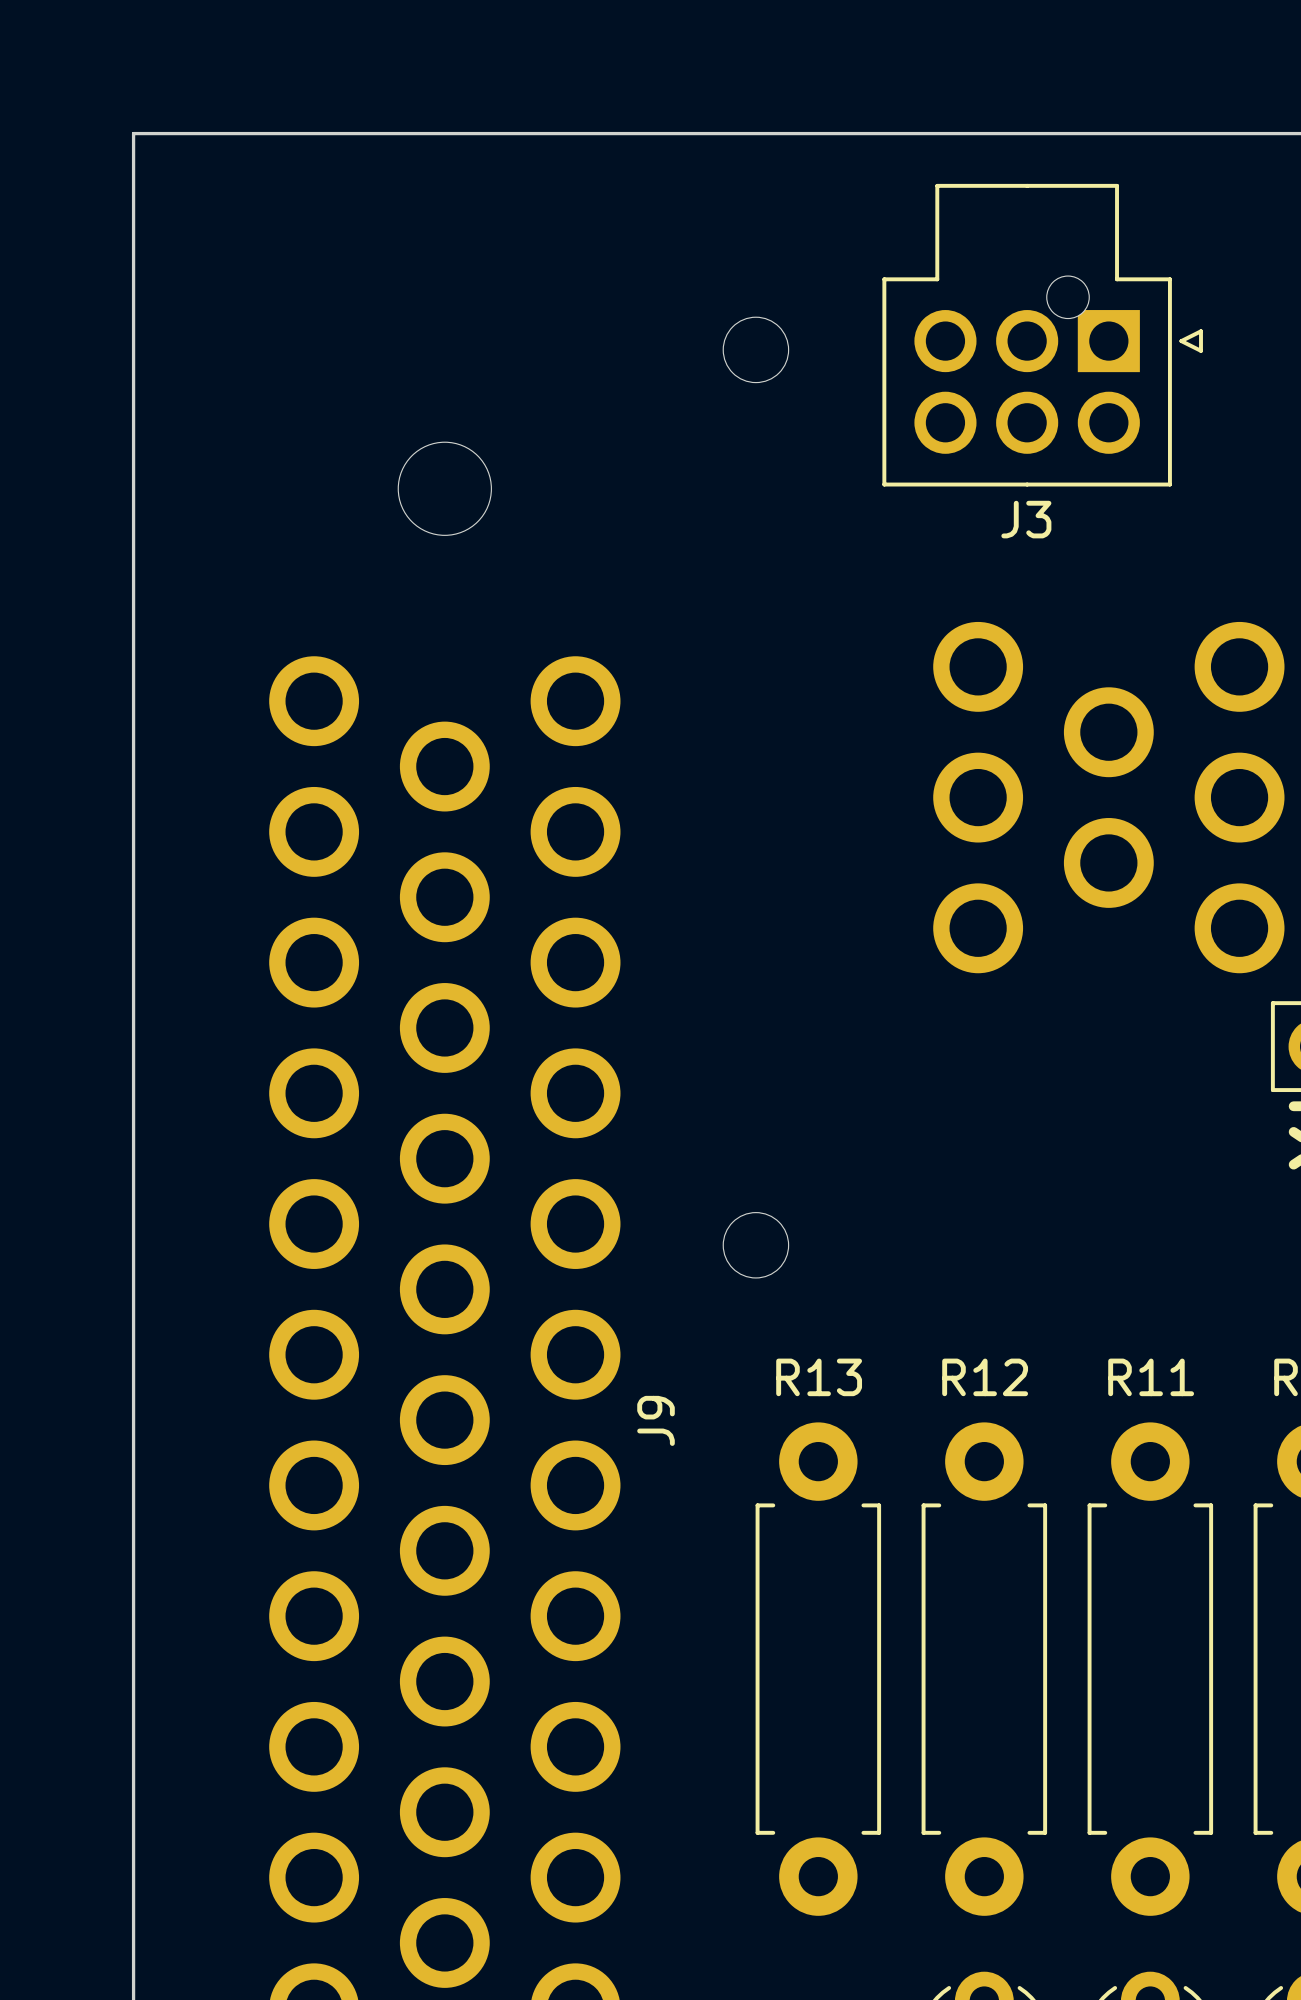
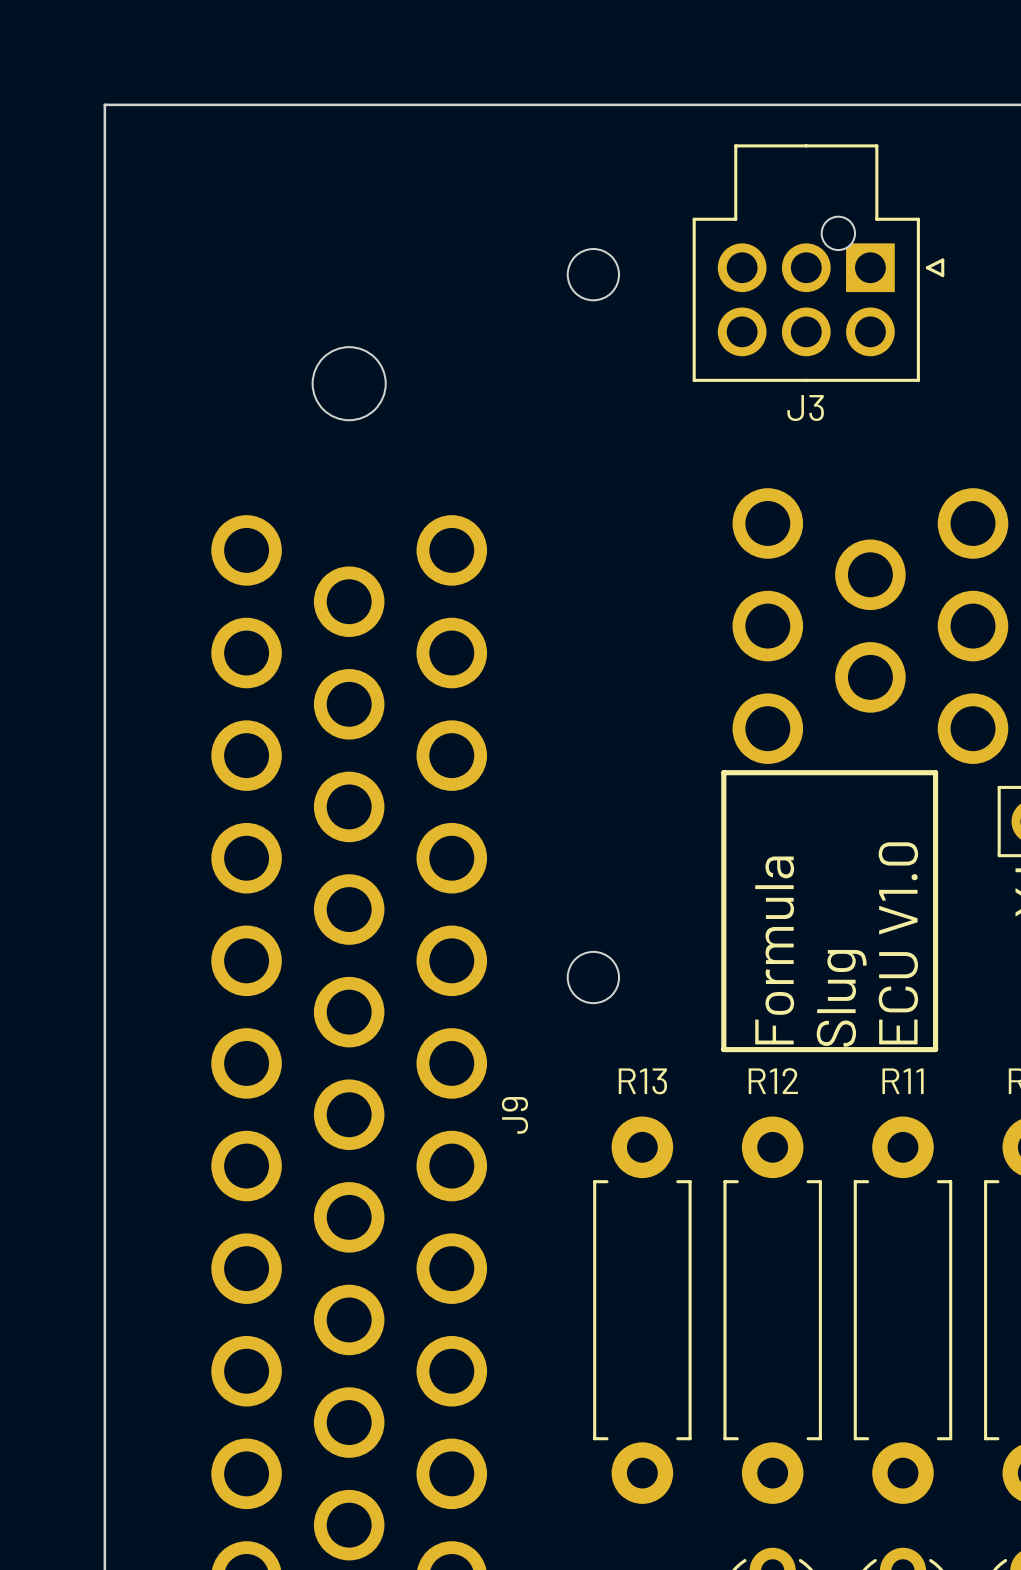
line: none -> (723, 772) (935, 772) (935, 1049) (723, 1049) (723, 772)
text: none -> ECU V1.0 (898, 943)
text: none -> Formula (774, 950)
text: none -> Slug (841, 998)

